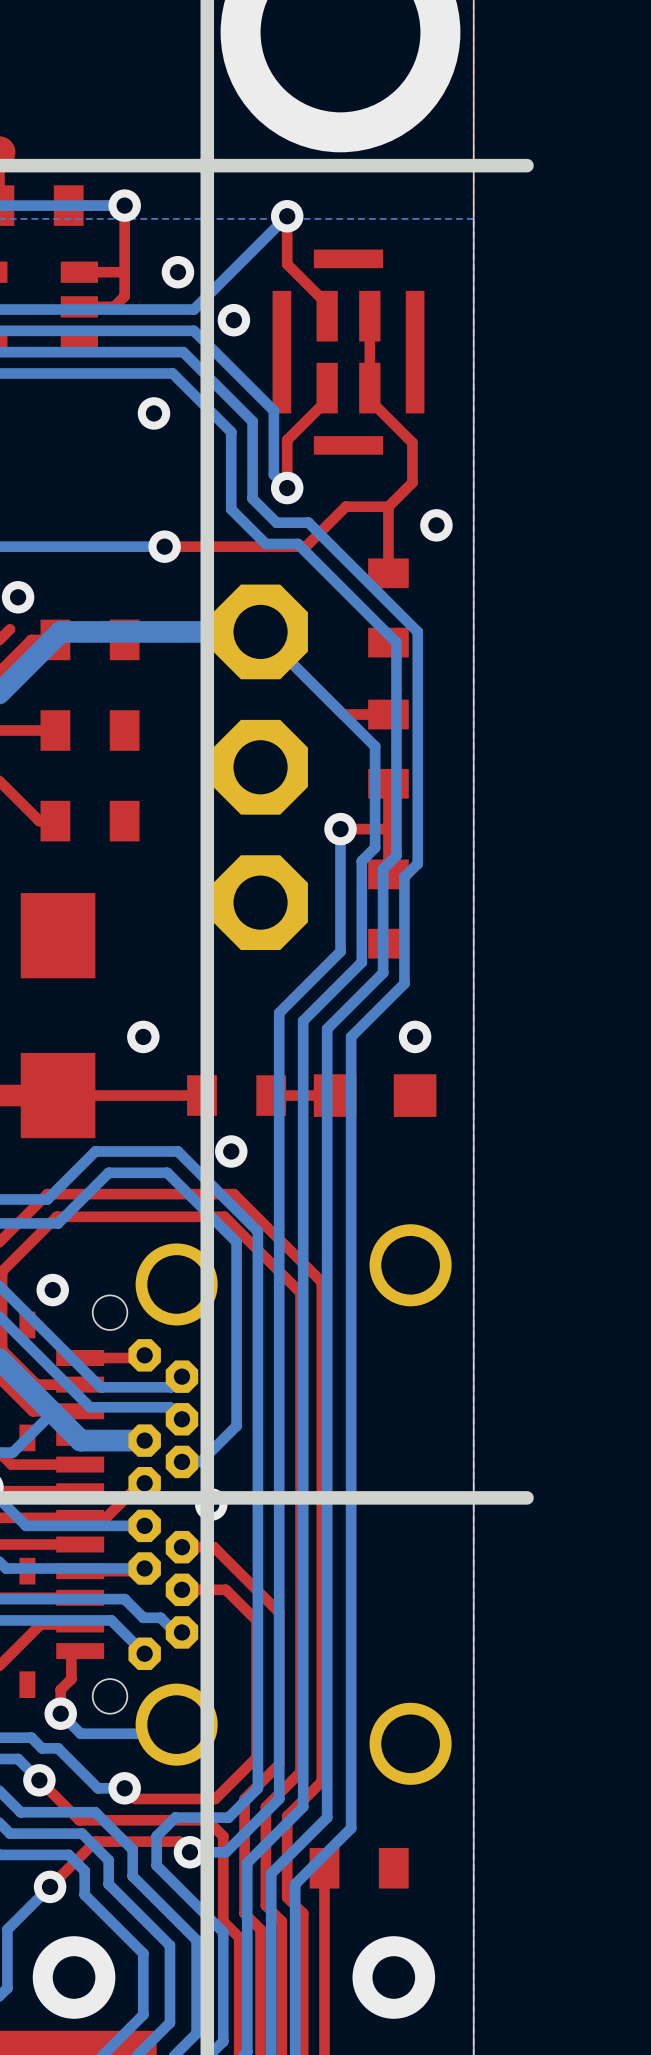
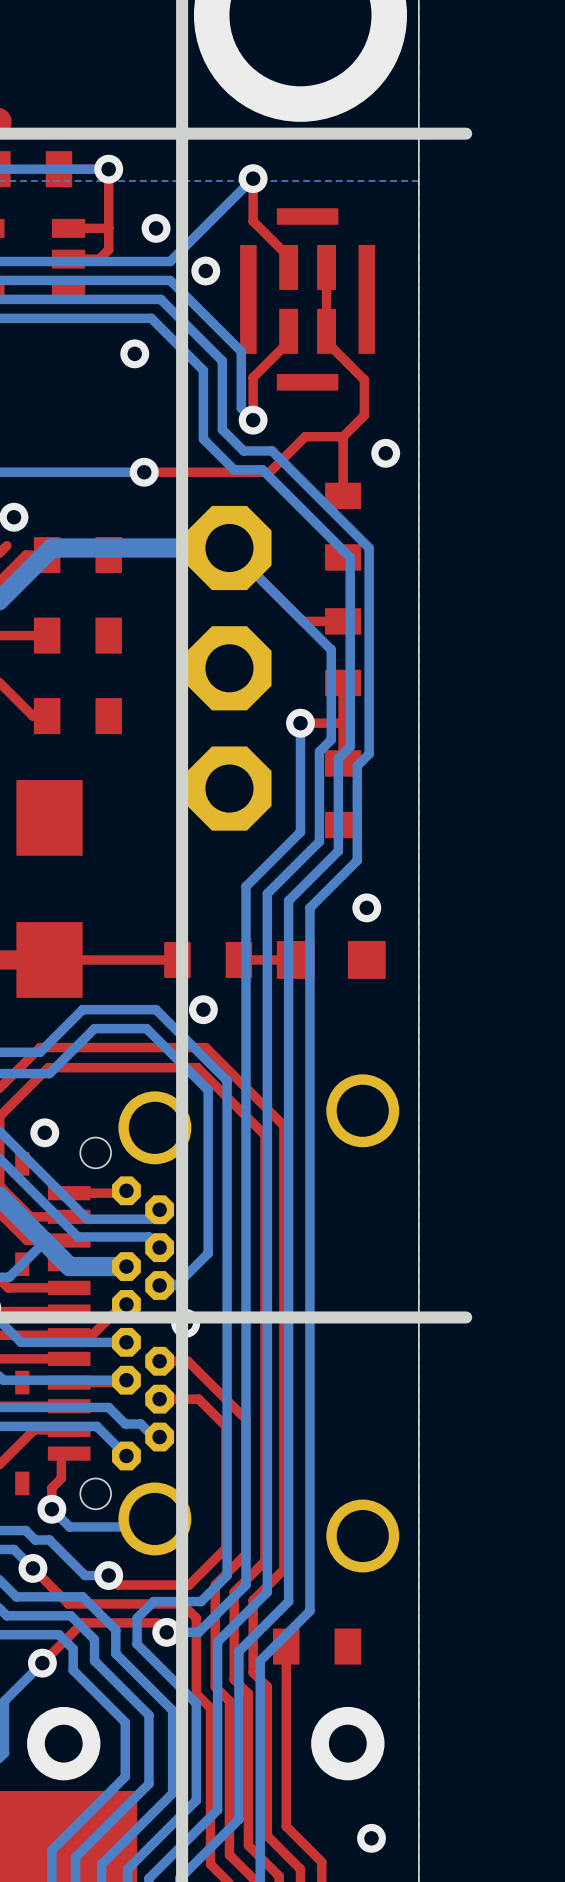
via: (143, 1036) -> none

